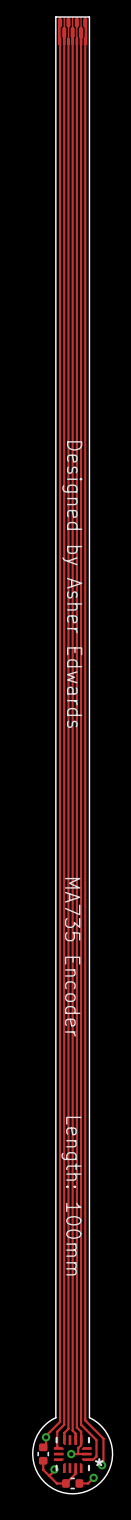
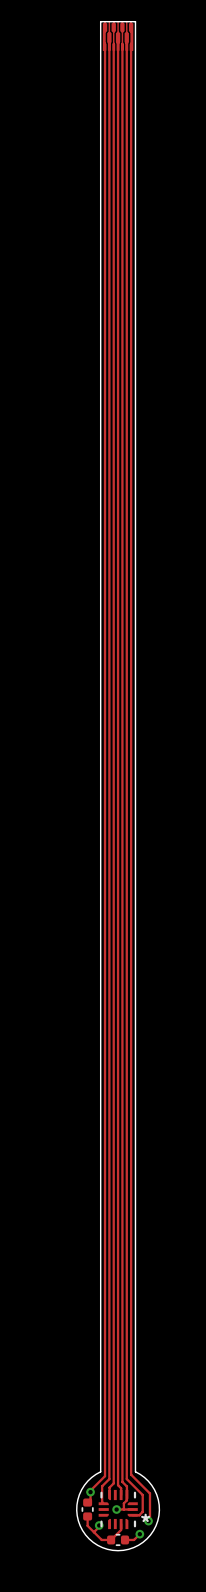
text: Designed by Asher Edwards (72, 584) -> none
text: MA735 Encoder (72, 957) -> none
text: Length: 100mm (71, 1196) -> none

